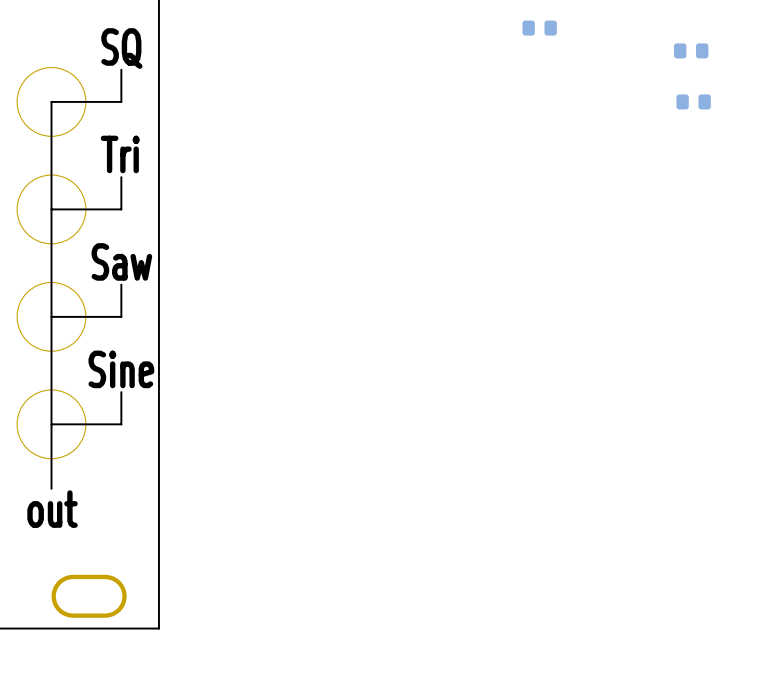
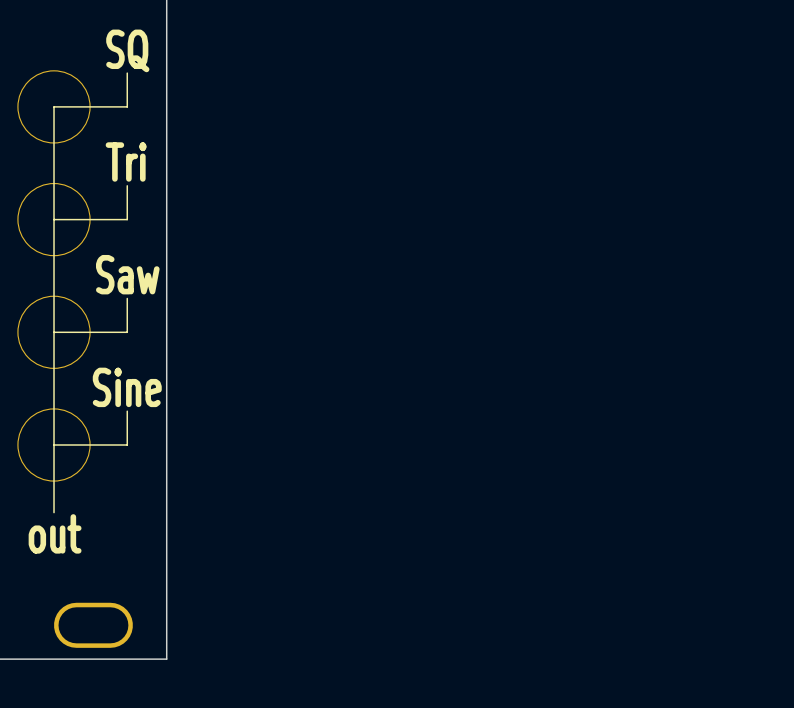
part: (539, 28) -> none
part: (691, 50) -> none
part: (693, 101) -> none

